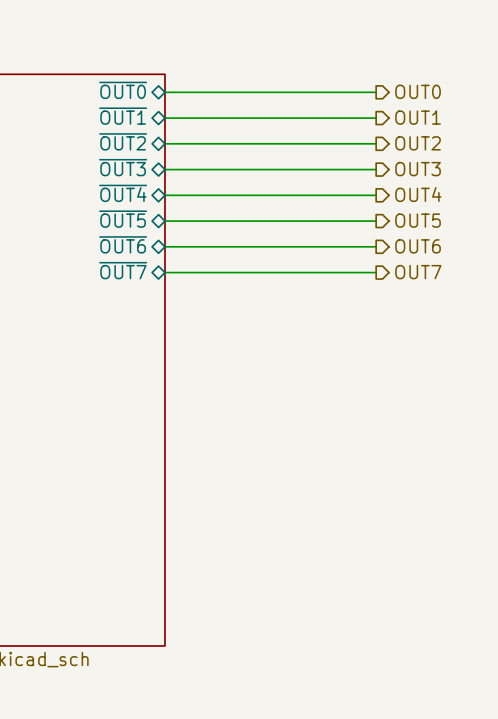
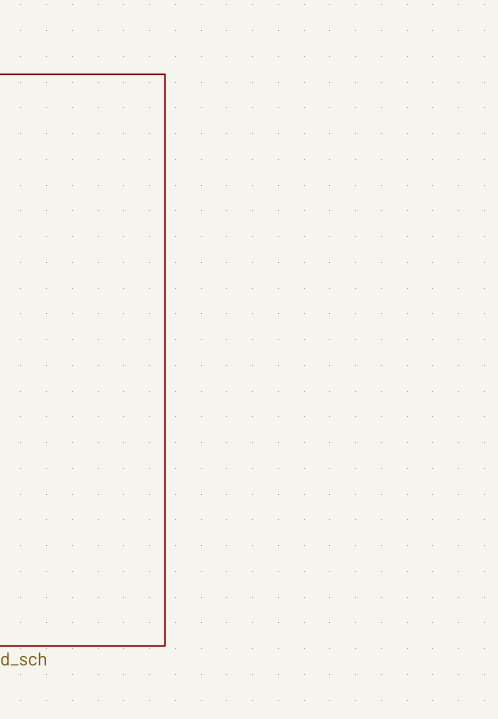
sheet pin: ~{OUT0} (123, 90) -> none
hierarchical label: OUT0 (418, 91) -> none
wire: (164, 92) (376, 92) -> none
sheet pin: ~{OUT1} (123, 116) -> none
hierarchical label: OUT1 (418, 117) -> none
wire: (164, 118) (376, 118) -> none
sheet pin: ~{OUT2} (123, 141) -> none
wire: (164, 143) (376, 143) -> none
hierarchical label: OUT2 (418, 143) -> none
sheet pin: ~{OUT3} (123, 167) -> none
wire: (164, 169) (376, 169) -> none
hierarchical label: OUT3 (418, 169) -> none
sheet pin: ~{OUT4} (123, 193) -> none
hierarchical label: OUT4 (418, 194) -> none
wire: (164, 195) (376, 195) -> none
sheet pin: ~{OUT5} (123, 219) -> none
hierarchical label: OUT5 (418, 220) -> none
wire: (164, 221) (376, 221) -> none
sheet pin: ~{OUT6} (123, 244) -> none
wire: (164, 246) (376, 246) -> none
hierarchical label: OUT6 (418, 246) -> none
sheet pin: ~{OUT7} (123, 270) -> none
wire: (164, 272) (376, 272) -> none
hierarchical label: OUT7 (418, 272) -> none

